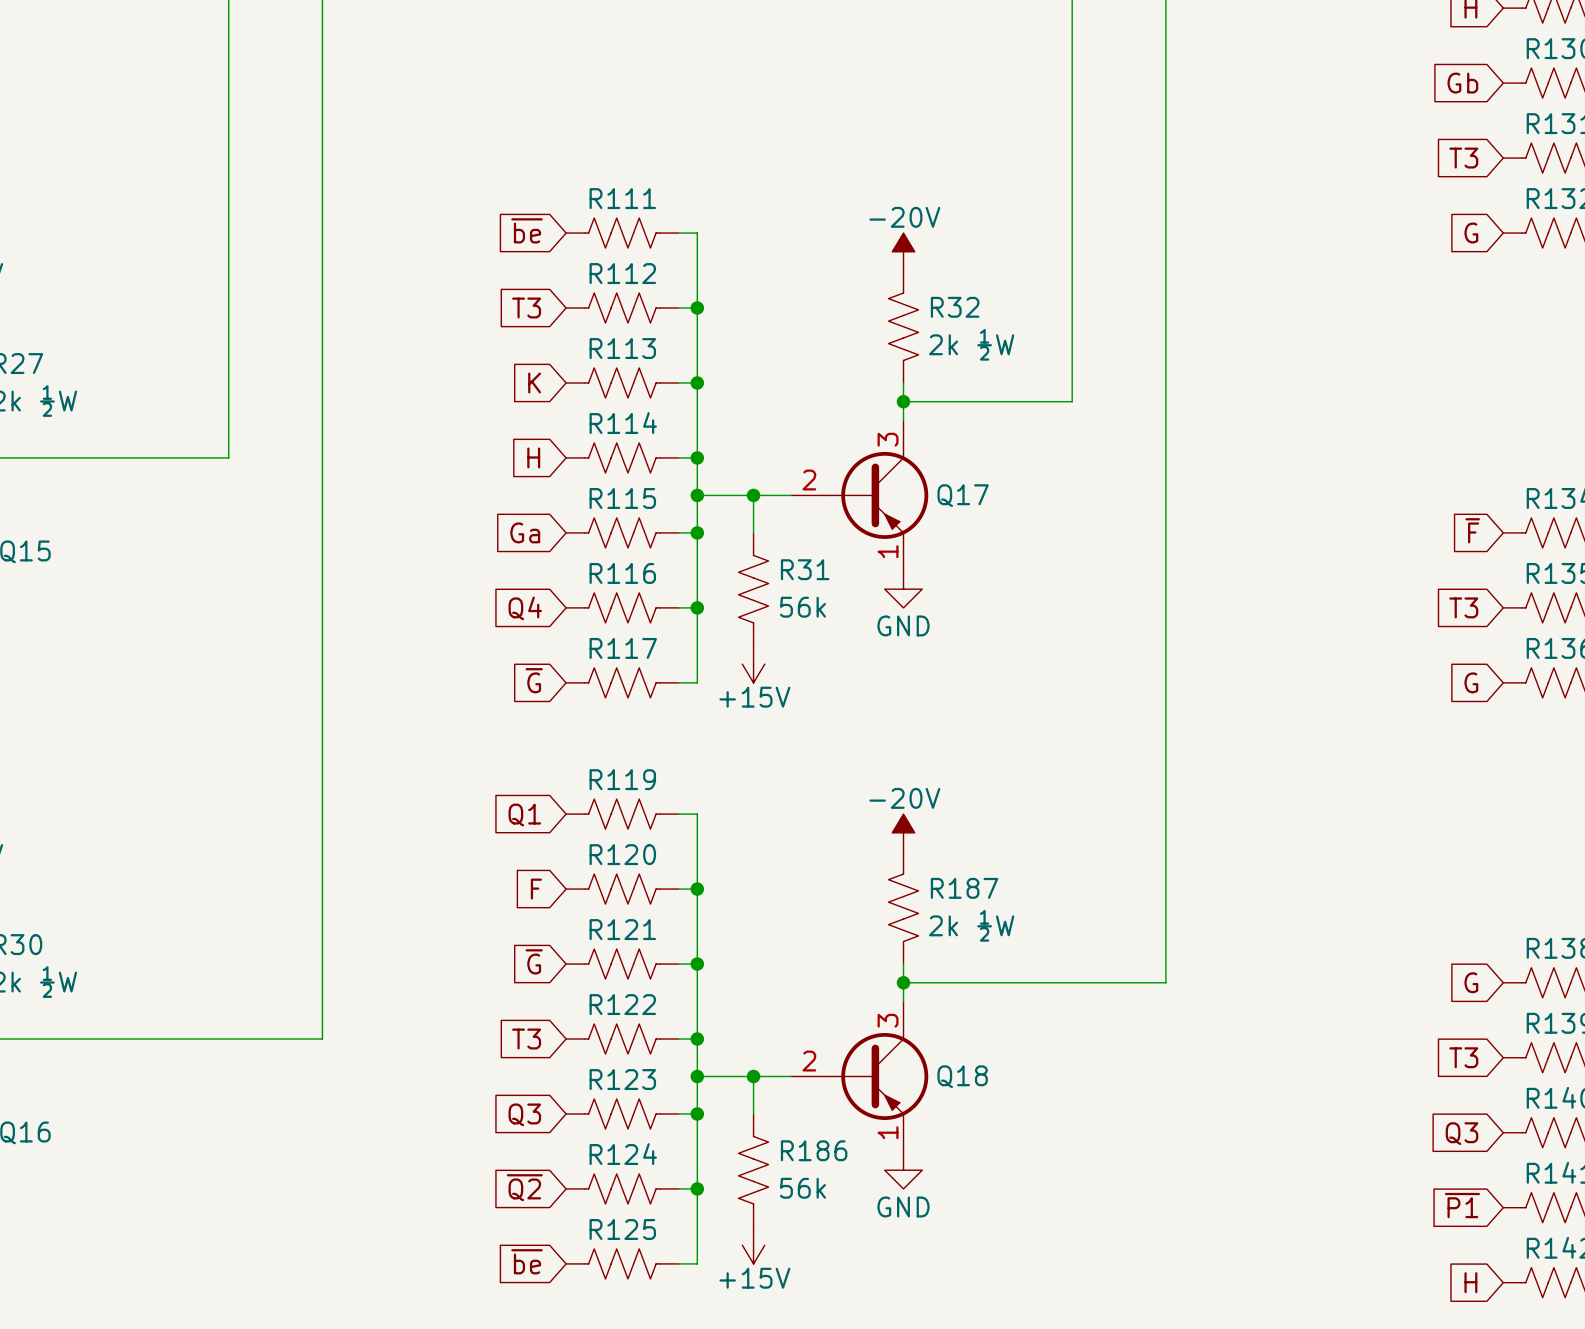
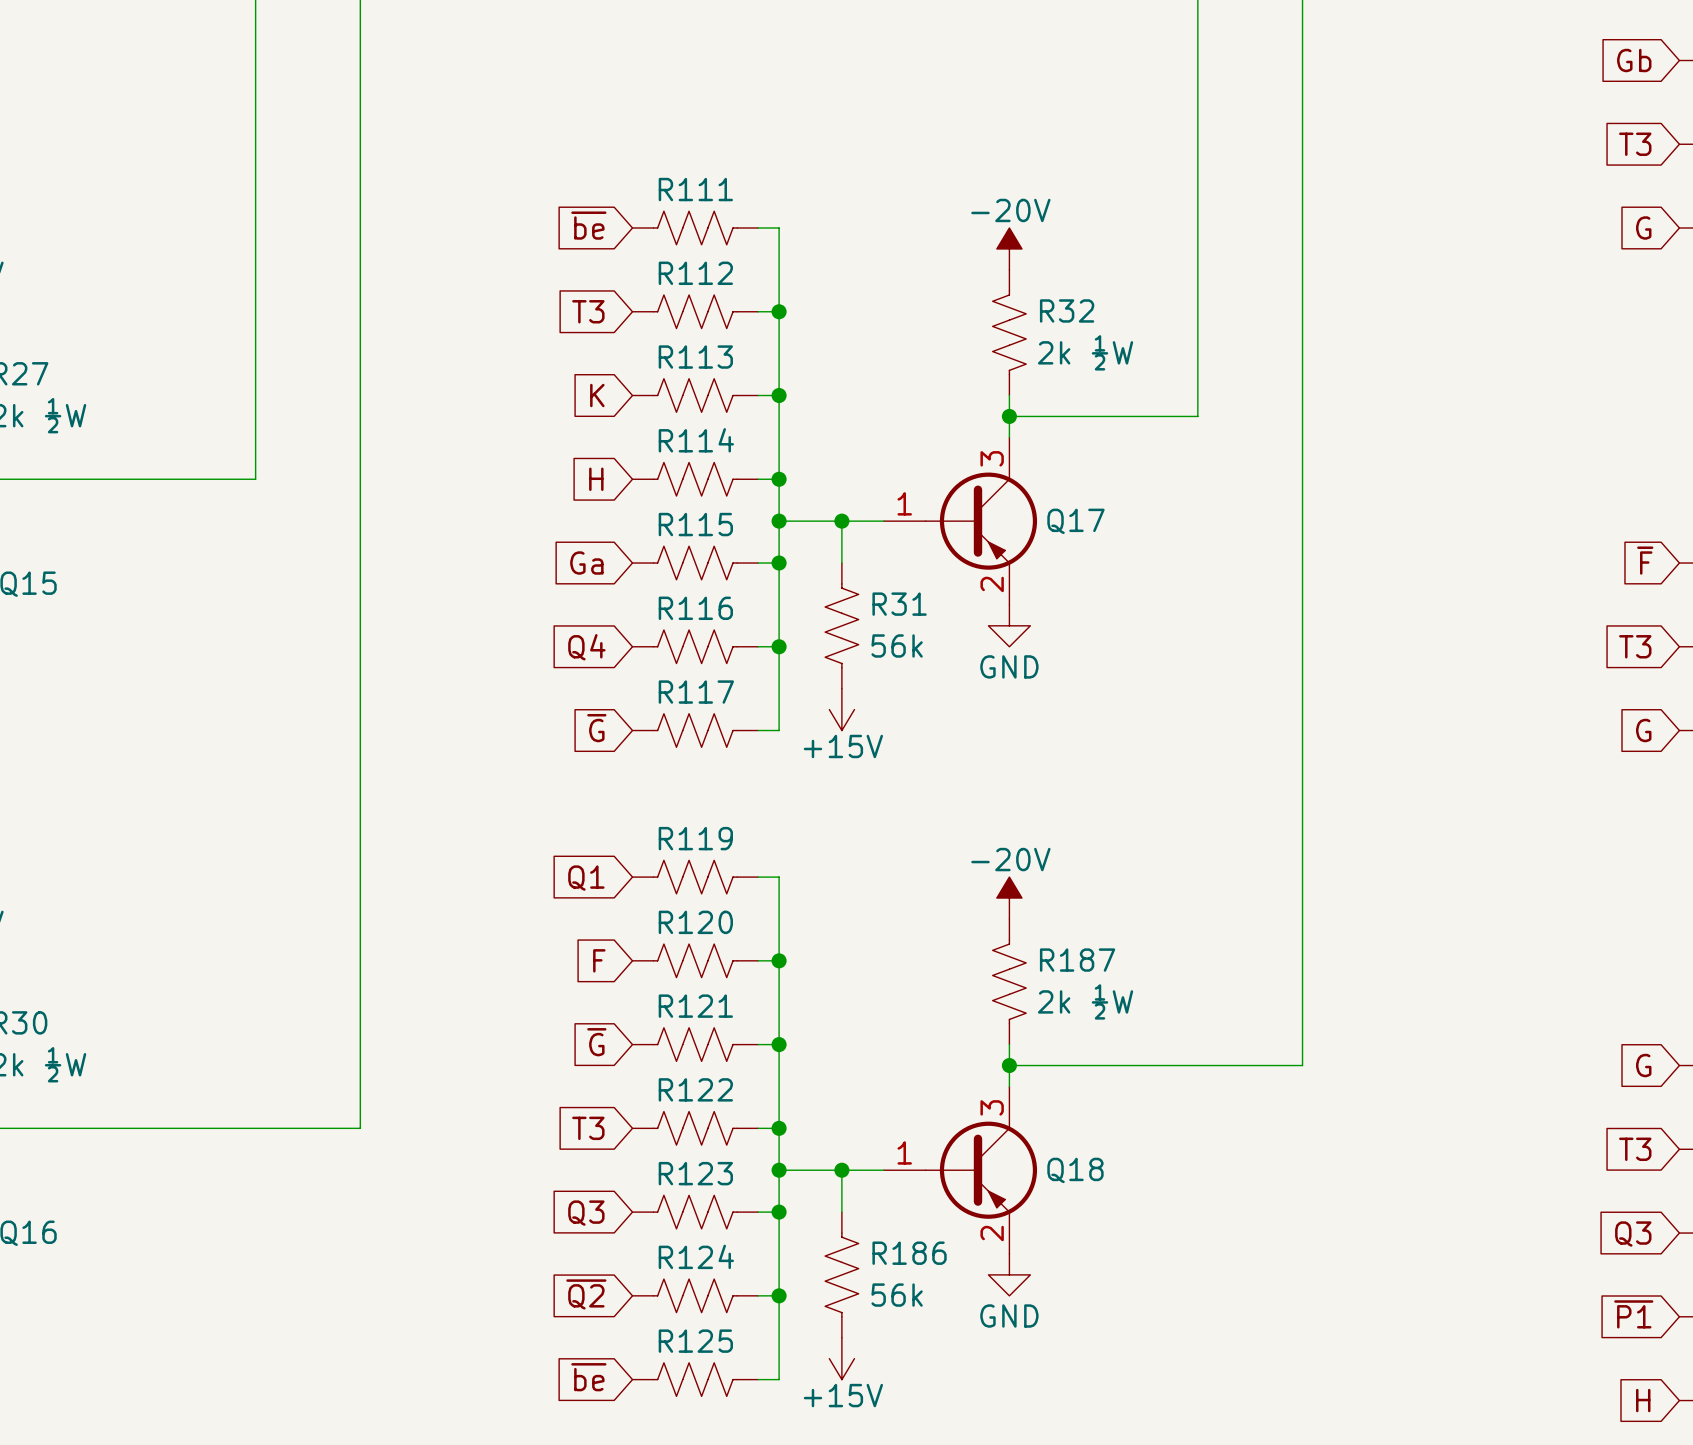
Q17 pin number: 2 (809, 479) -> 1 (904, 503)
Q17 pin number: 1 (888, 551) -> 2 (992, 584)
Q18 pin number: 2 (809, 1061) -> 1 (904, 1152)
Q18 pin number: 1 (888, 1132) -> 2 (992, 1233)

